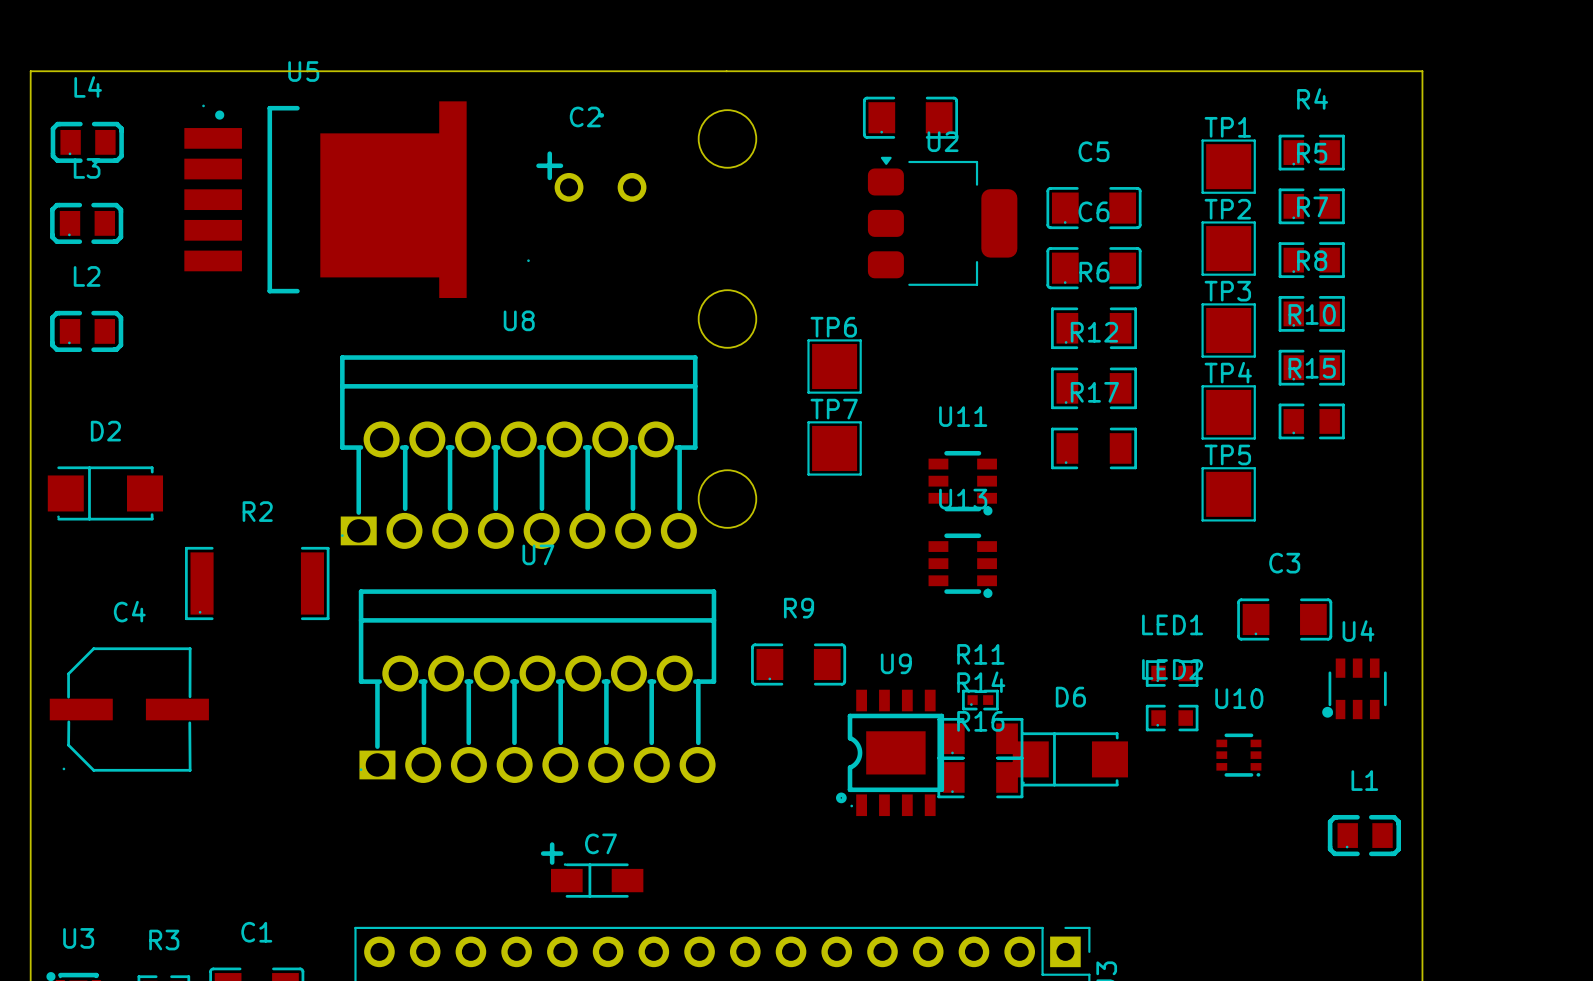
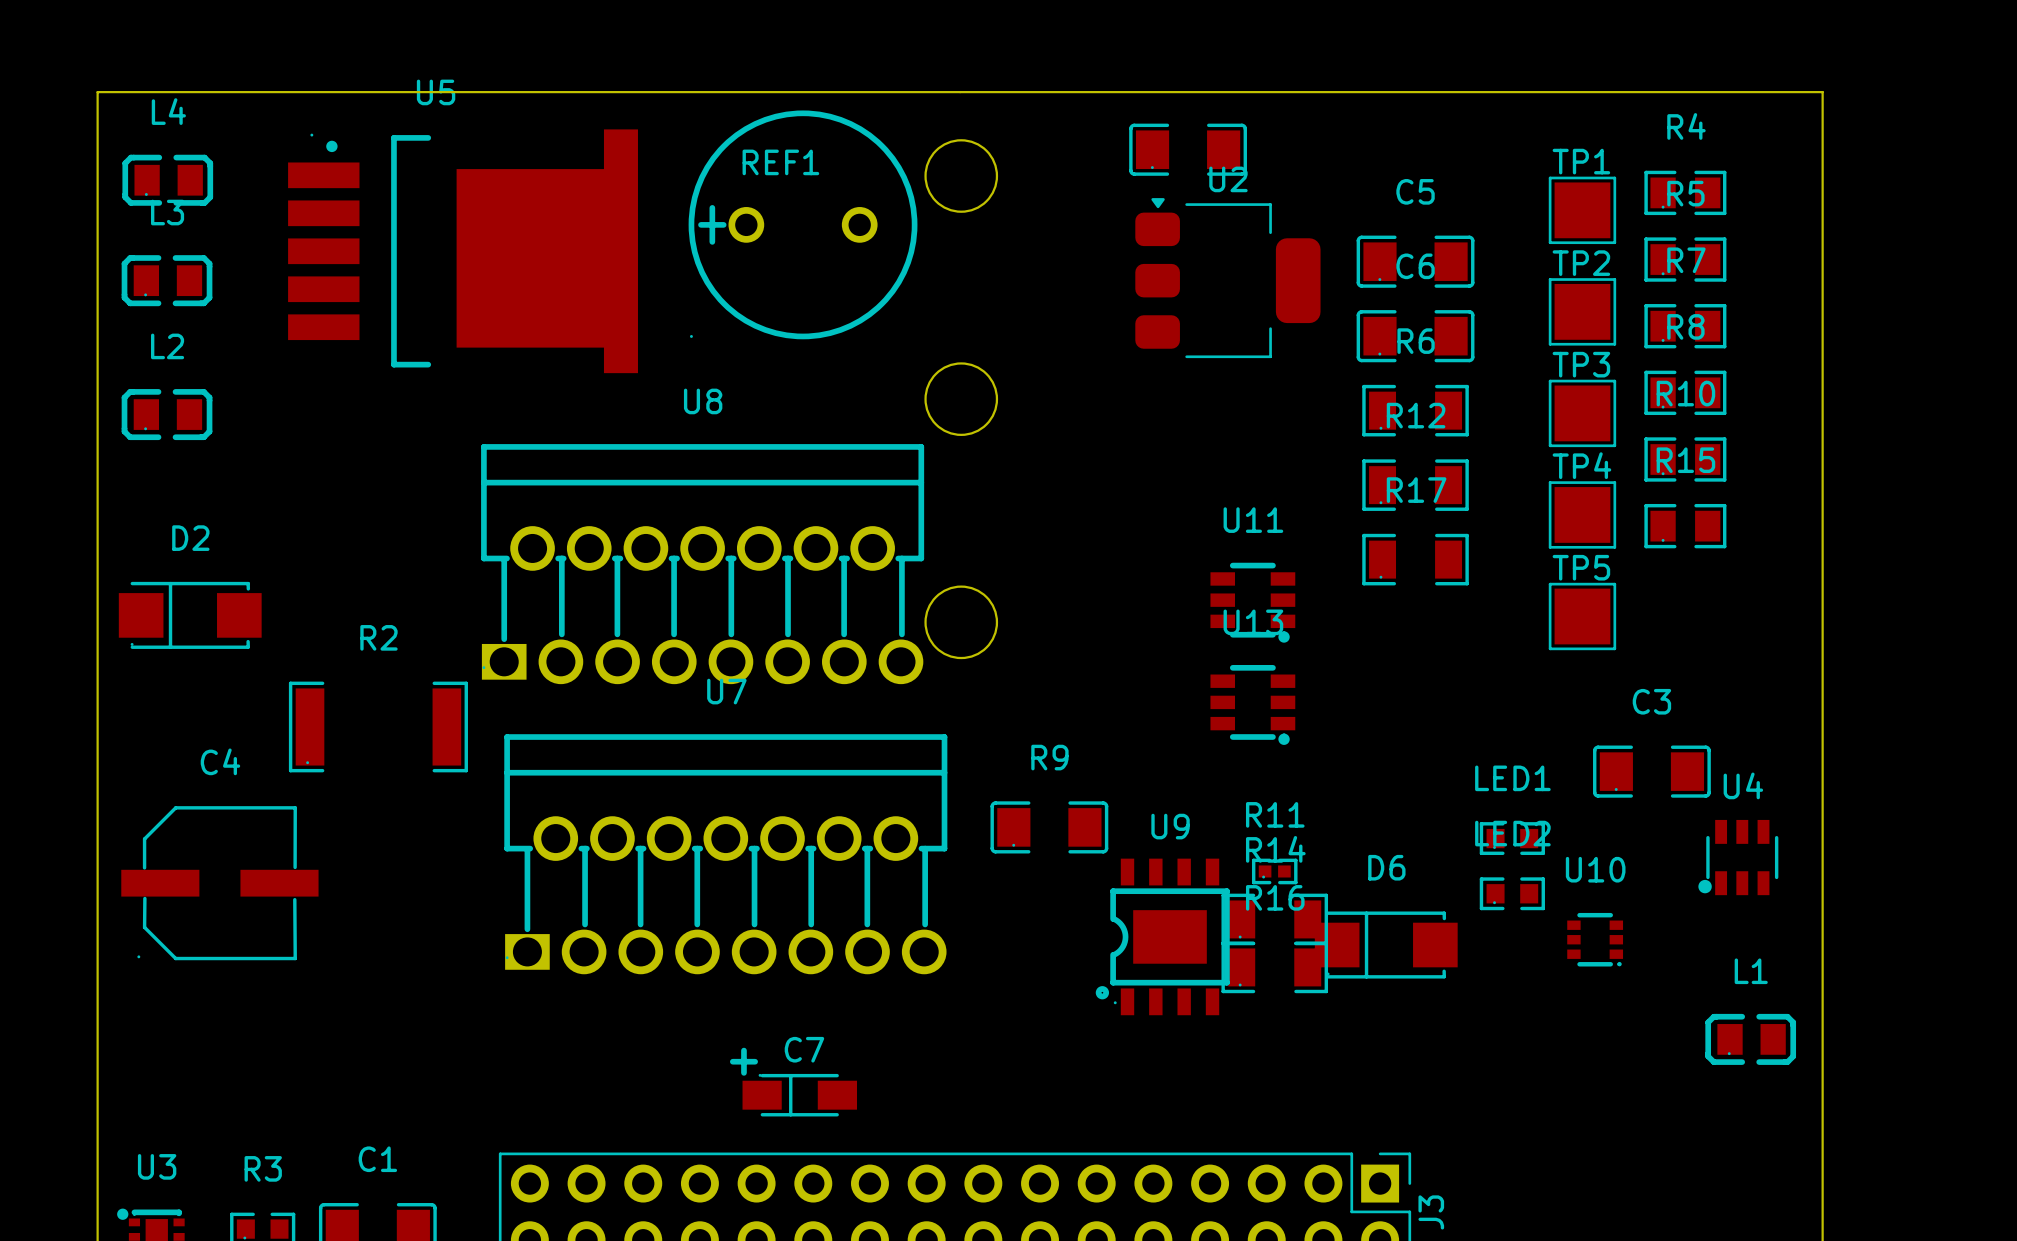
REF1: none -> (803, 224)
C2: (586, 187) -> none
TP6: (834, 366) -> none
TP7: (834, 448) -> none

